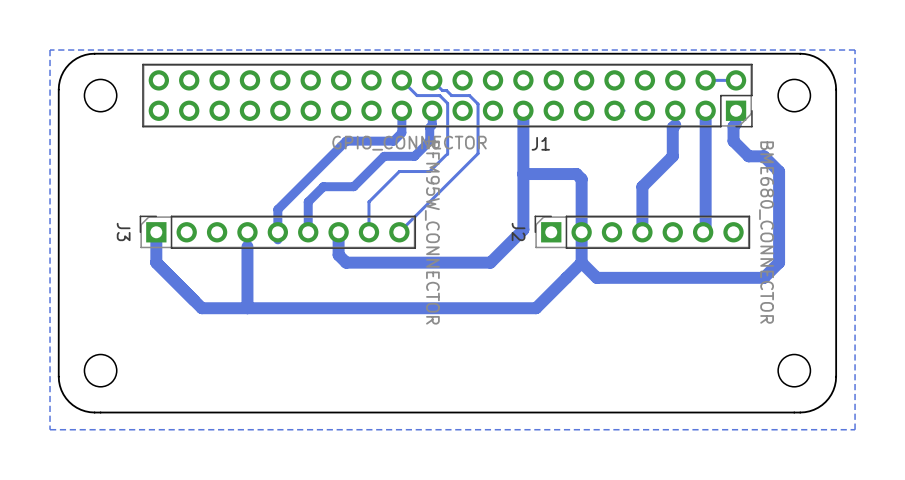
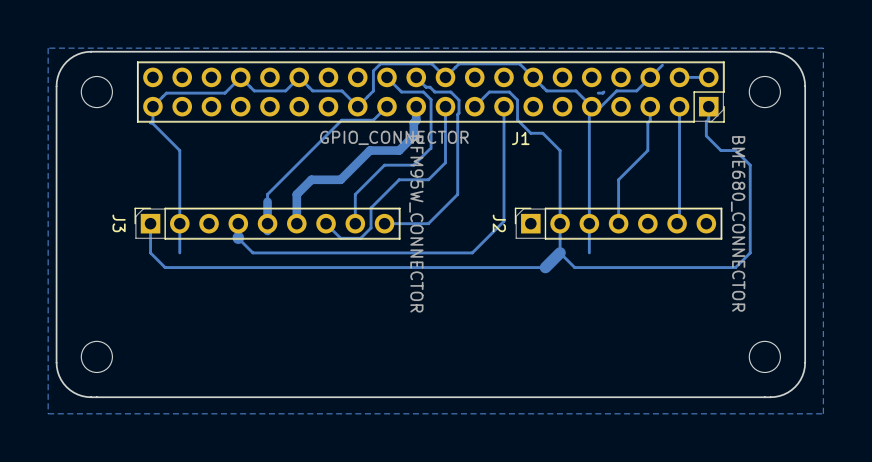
bottom track: none -> (662, 65) (636, 90) (616, 90) (600, 106)
bottom track: (468, 95) (478, 104) (478, 153) (462, 169) -> (445, 106) (445, 162)
bottom track: none -> (450, 92) (459, 100) (457, 194) (428, 223) (384, 223)
bottom track: none -> (603, 92) (598, 93)
bottom track: (401, 110) (401, 132) (393, 141) (346, 141) (277, 209) -> (386, 106) (373, 120) (341, 120) (267, 194) (267, 201)
bottom track width: thick (523, 110) (523, 229) (490, 262) (346, 262) -> thin (504, 106) (504, 221) (472, 252) (333, 252)
bottom track: none -> (591, 106) (576, 90) (546, 90) (519, 63) (459, 63) (445, 77) (431, 63) (380, 63) (373, 70) (373, 90) (357, 106) (342, 90) (312, 90) (299, 77) (285, 90) (254, 90) (240, 77) (225, 93) (166, 93) (152, 106) (152, 120) (150, 122) (179, 150) (179, 252)
bottom track width: thick (705, 110) (705, 229) -> thin (679, 106) (679, 221)
bottom track: none -> (589, 109) (589, 252)
bottom track width: thick (736, 123) (733, 126) (733, 141) (748, 156) (763, 156) (779, 171) (779, 262) (763, 277) (596, 277) (581, 262) (581, 179) -> thin (708, 119) (706, 121) (706, 135) (720, 150) (735, 150) (750, 165) (750, 252) (735, 267) (574, 267) (560, 252) (560, 172)
bottom track width: thick (675, 125) (672, 127) (672, 156) (642, 186) (642, 232) -> thin (650, 120) (647, 122) (647, 150) (618, 179) (618, 223)
bottom track: (523, 174) (576, 174) (581, 179) -> (474, 106) (489, 92) (509, 92) (517, 100) (517, 119) (530, 133) (542, 133) (560, 150) (560, 172)
bottom track: (444, 186) (399, 232) -> (428, 179) (399, 179) (371, 207) (371, 227) (360, 238) (340, 238) (326, 223)
bottom track width: thick (156, 232) (156, 262) (171, 277) -> thin (150, 223) (150, 252) (165, 267)
bottom track: (338, 232) (338, 255) (346, 262) -> (238, 238) (252, 252) (333, 252)
bottom track: (247, 247) (247, 308) -> none
bottom track: (566, 277) (536, 308) (201, 308) (171, 277) -> (545, 267) (165, 267)

